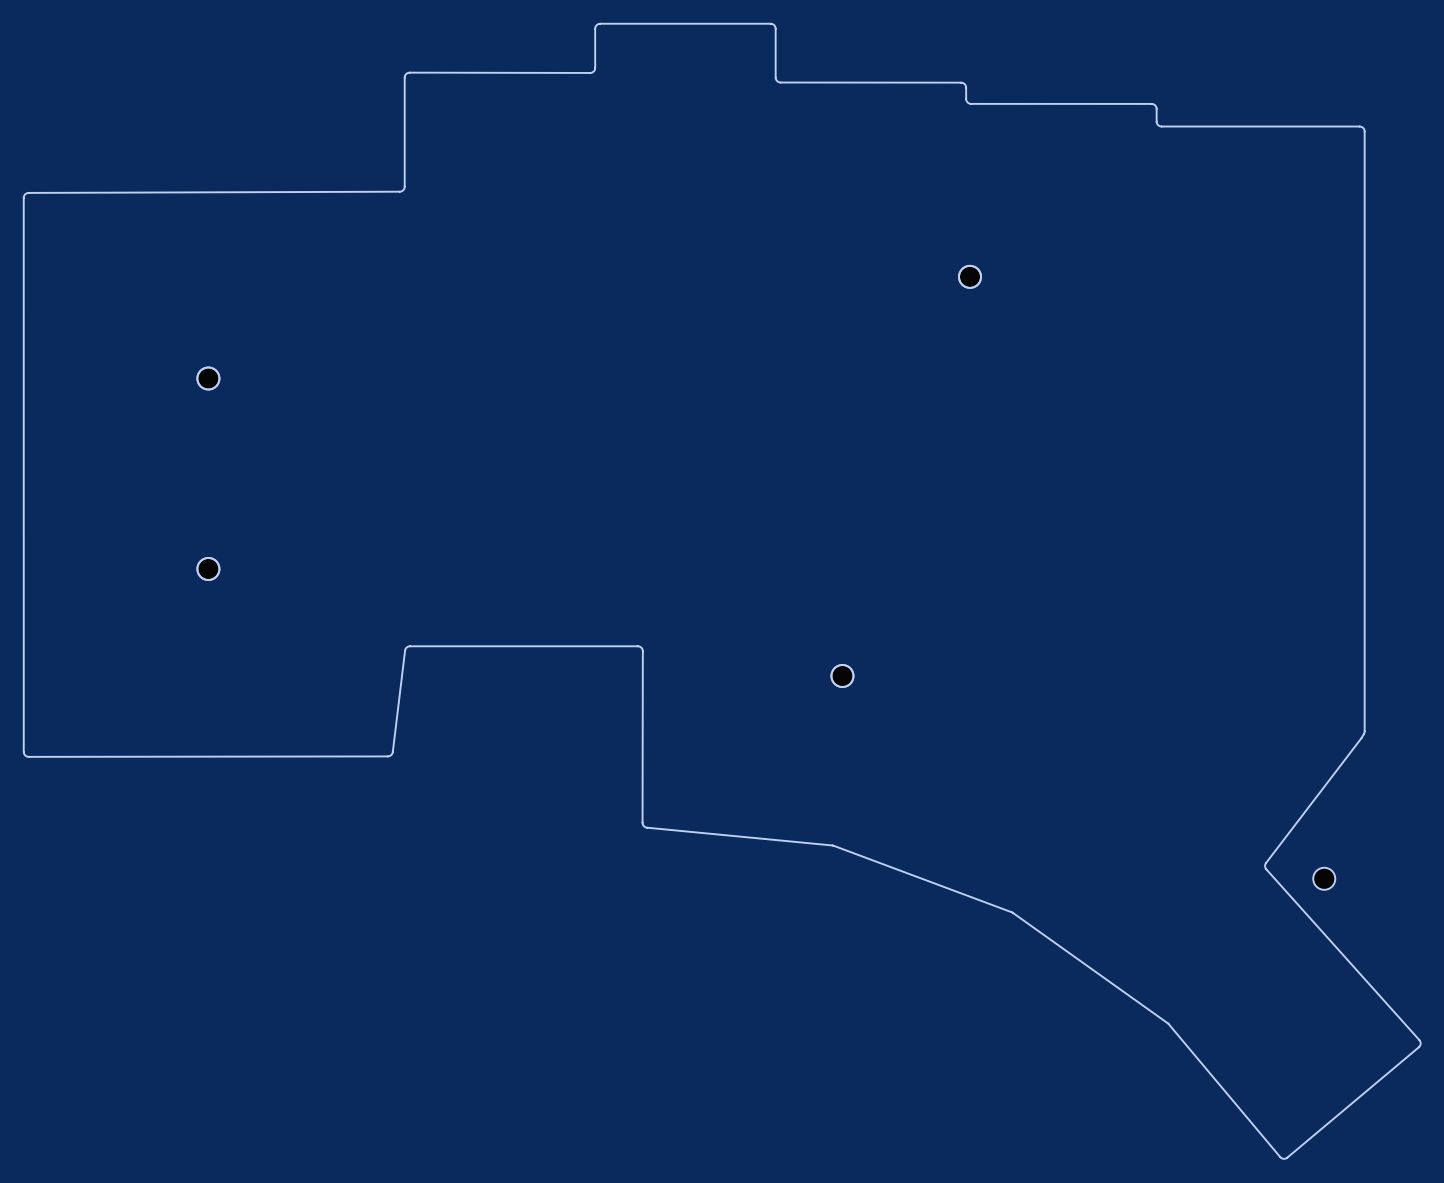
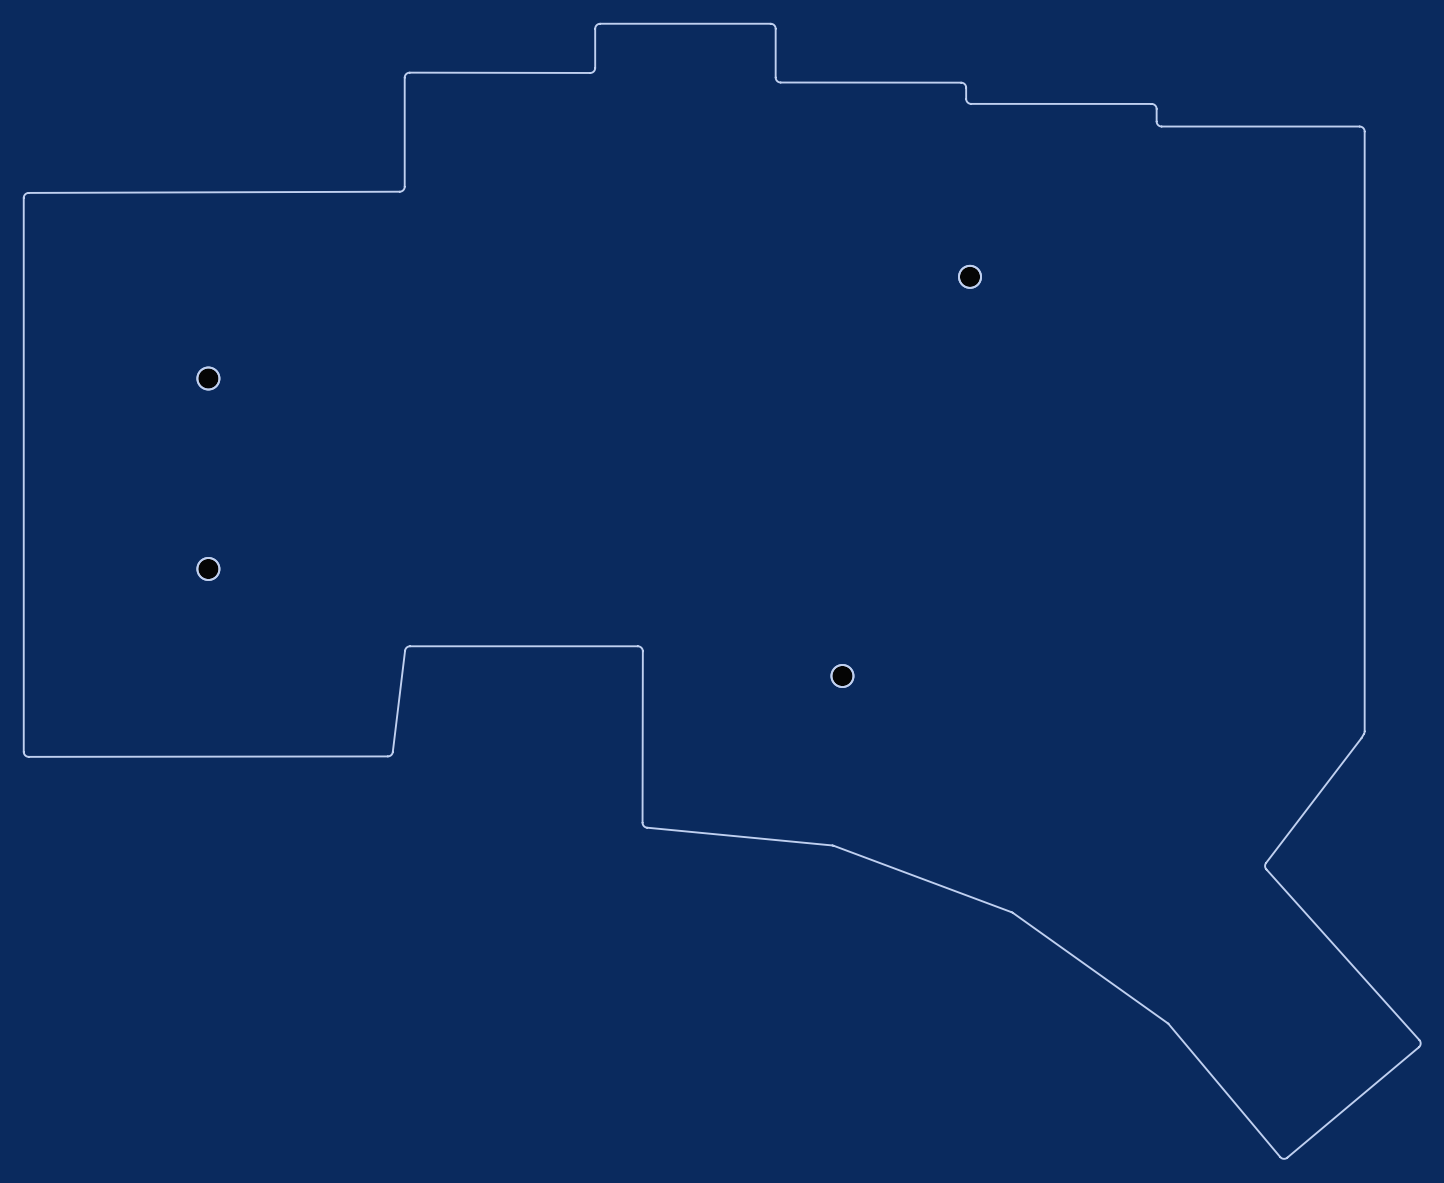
part: (1324, 878) -> none

